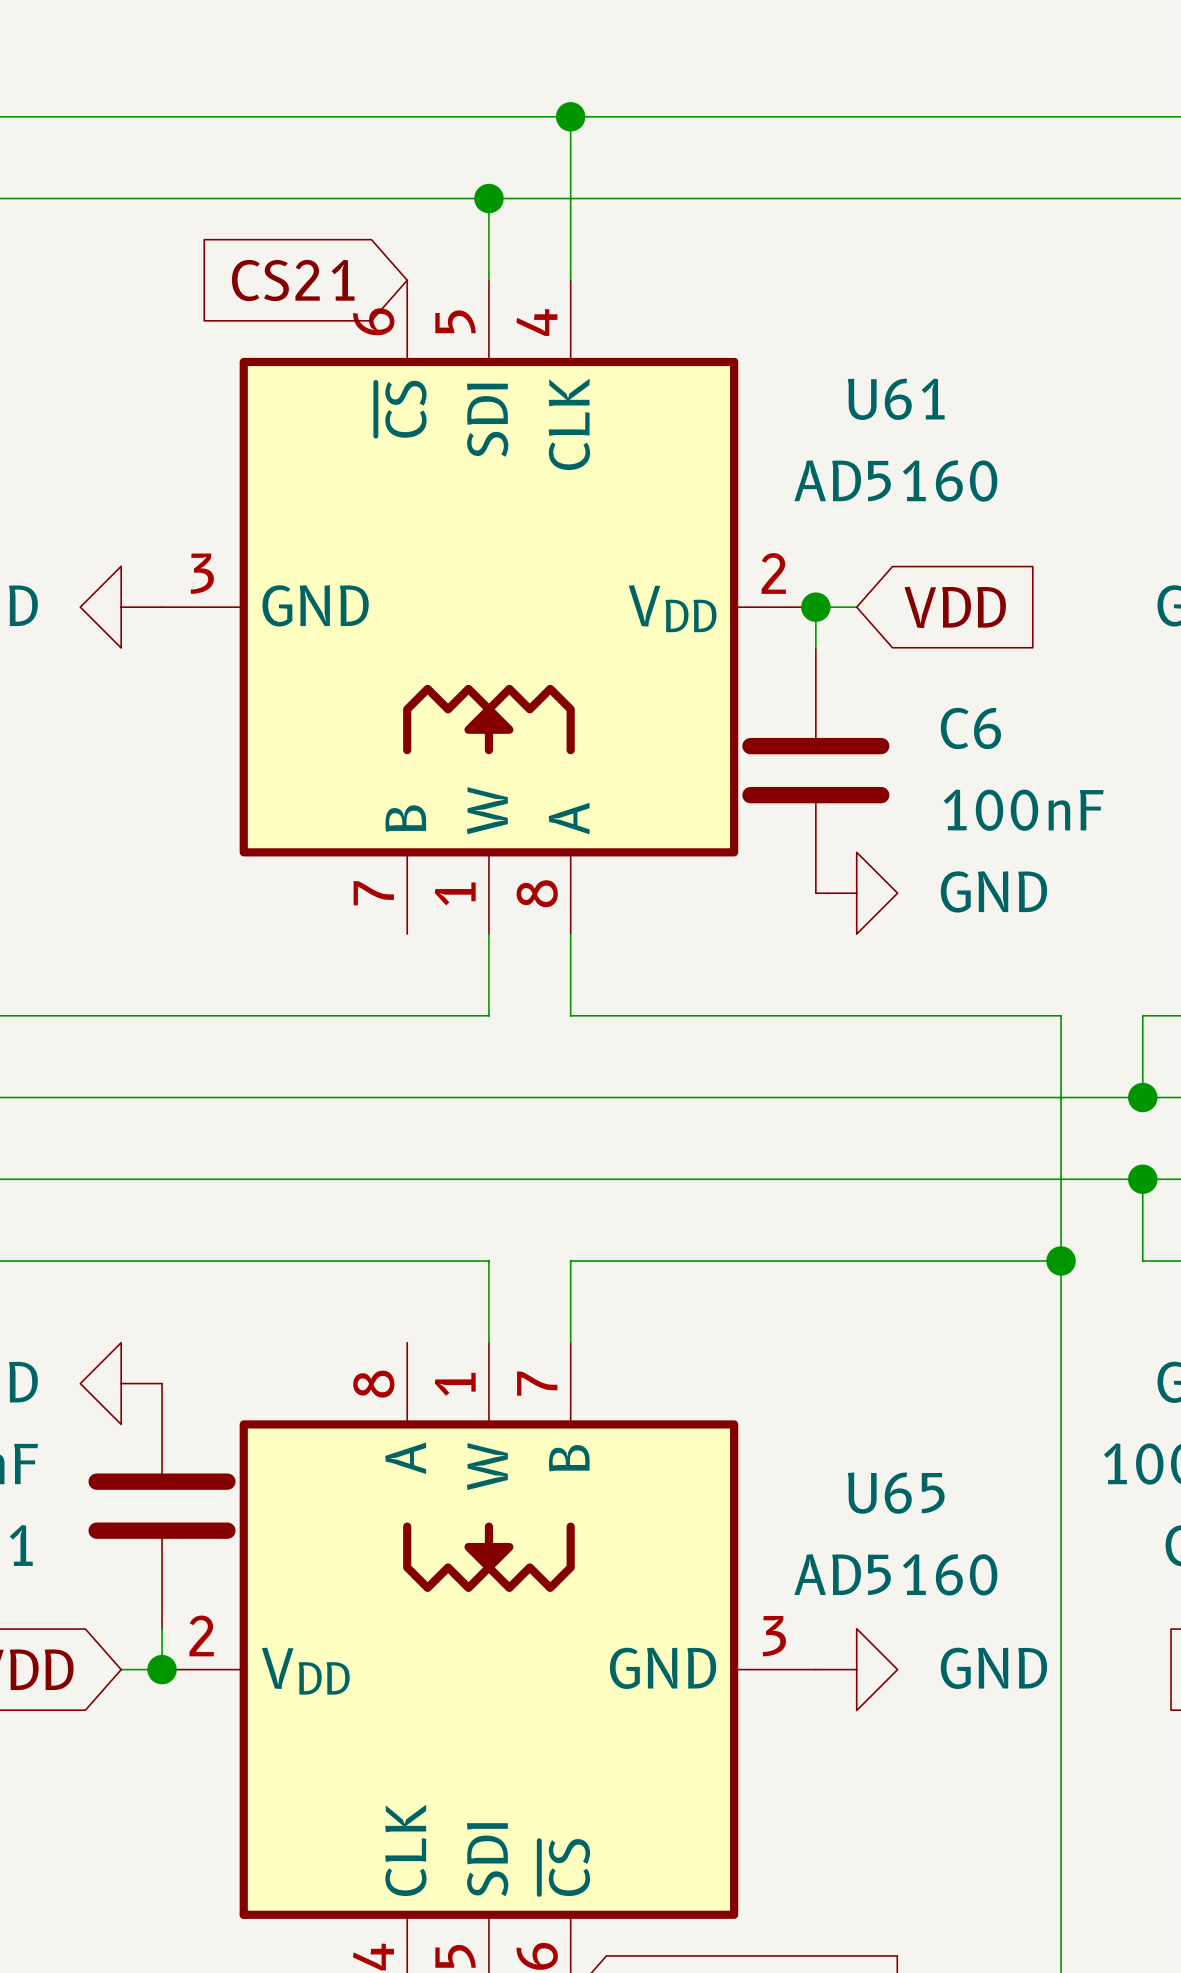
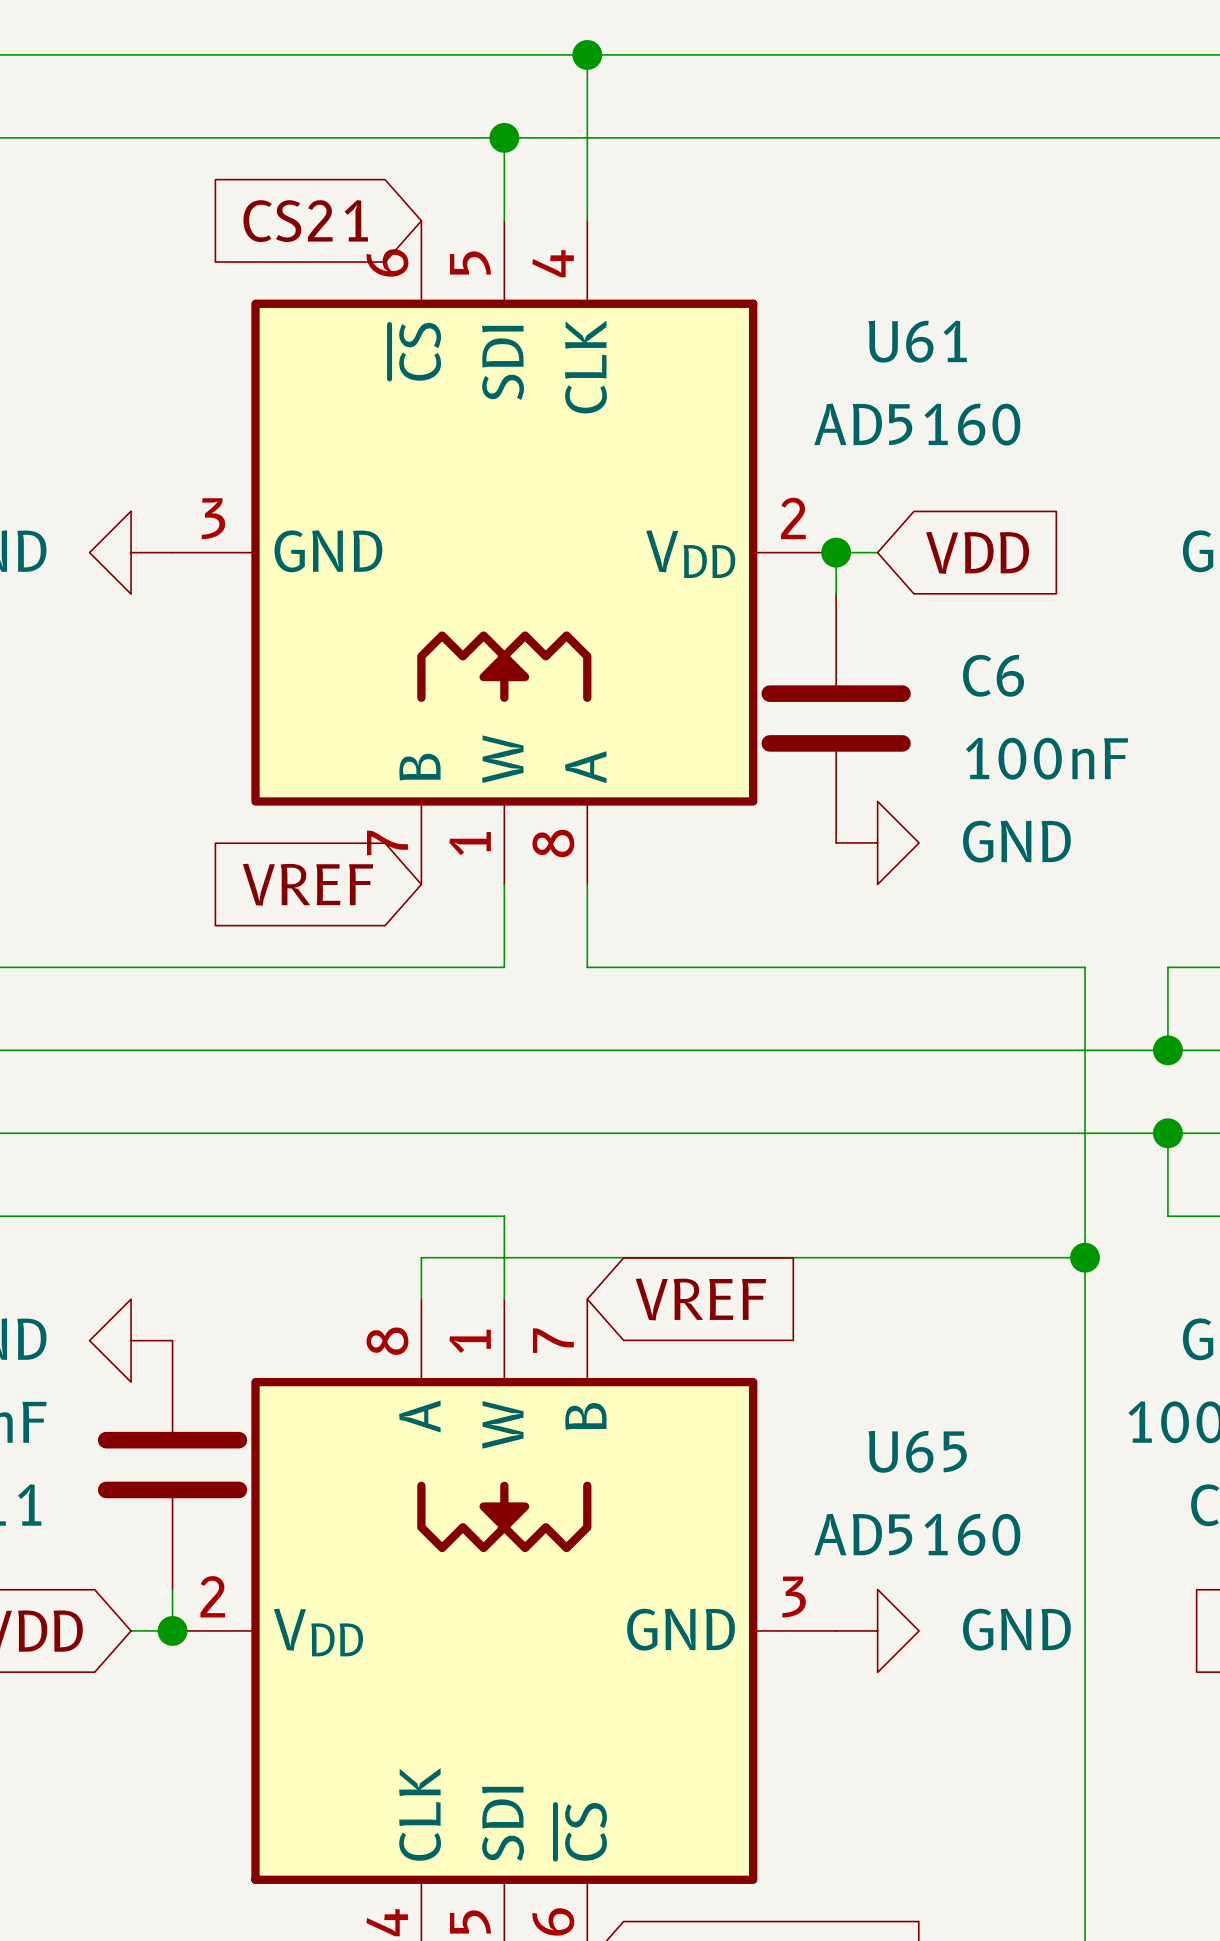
global label: none -> VREF (308, 884)
wire: (1061, 1260) (570, 1260) (570, 1342) -> none
junction position: (1061, 1260) -> (1084, 1257)
wire: none -> (1084, 1257) (421, 1257) (421, 1299)
global label: none -> VREF (700, 1299)

